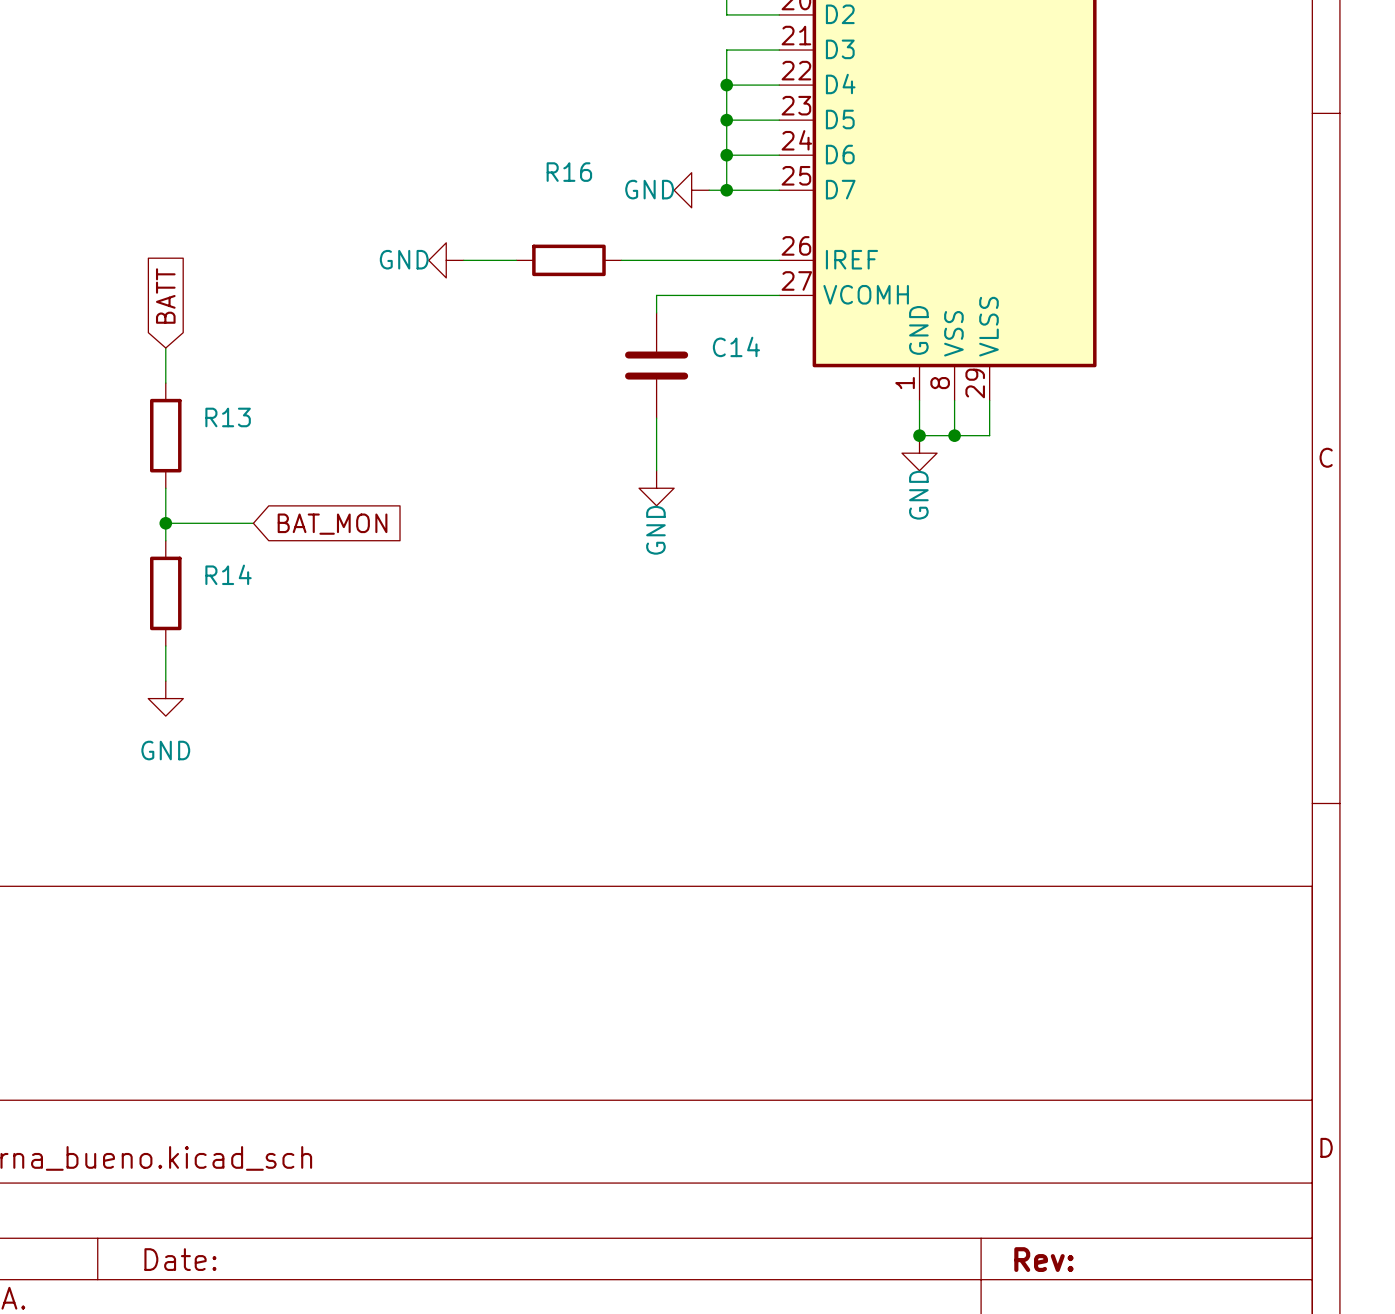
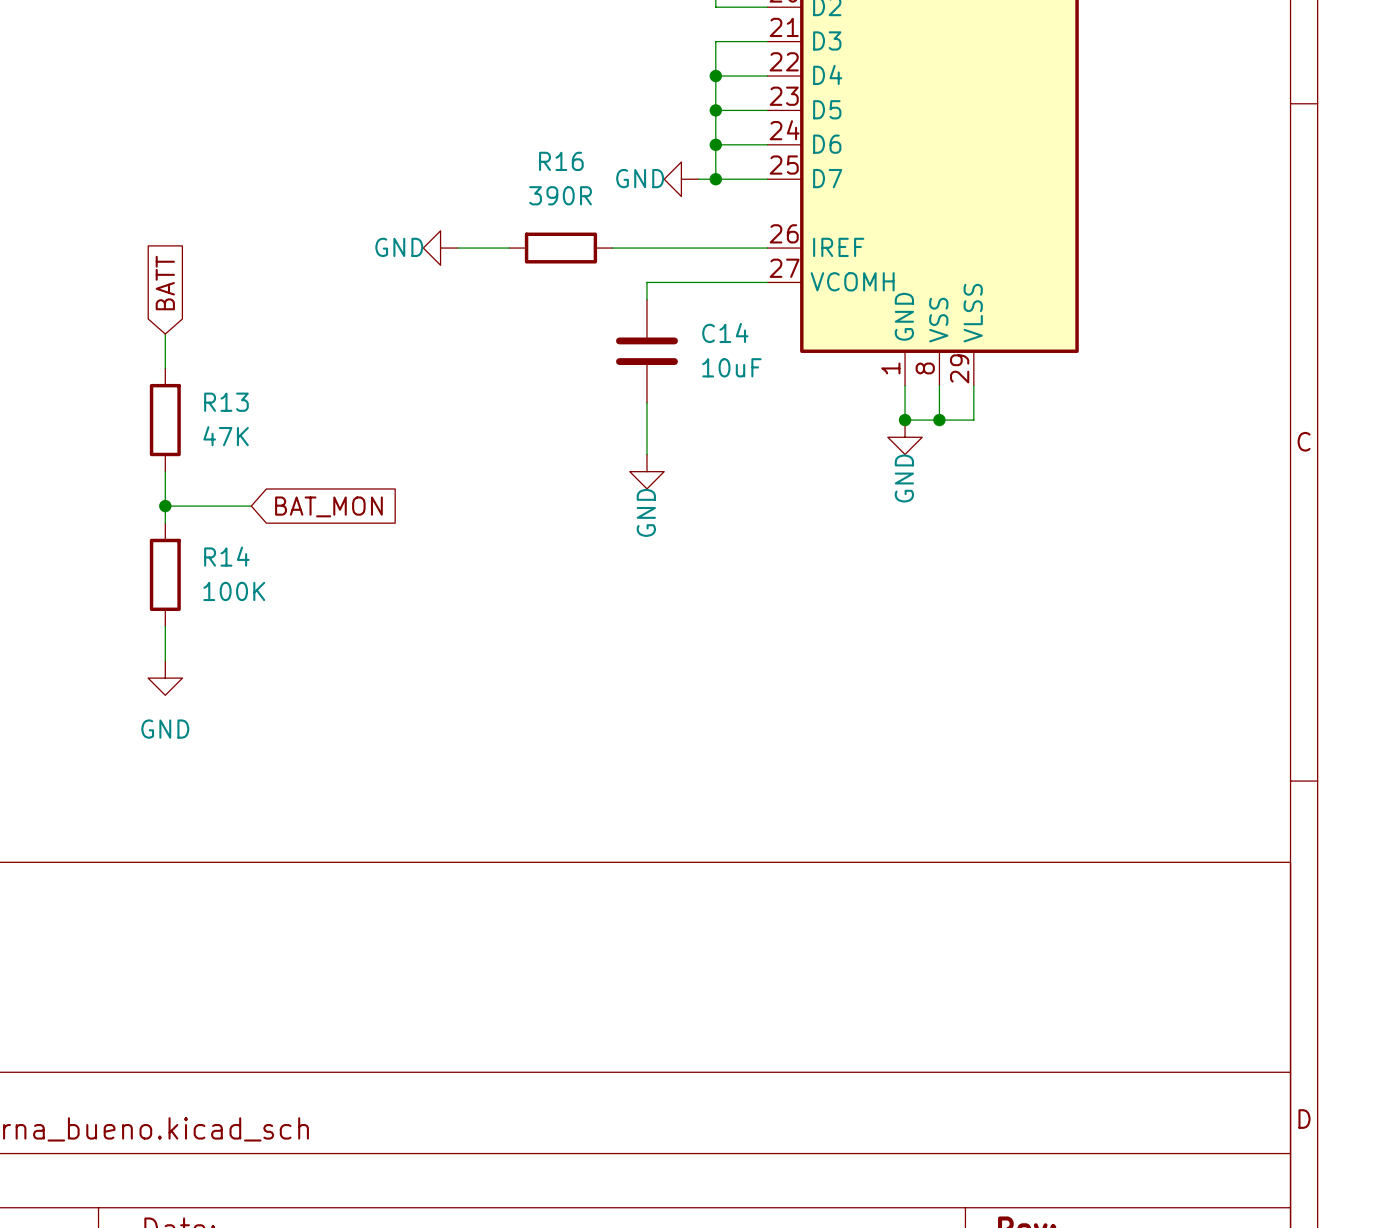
R16 value: none -> 390R (560, 195)
C14 value: none -> 10uF (731, 367)
R13 value: none -> 47K (226, 436)
R14 value: none -> 100K (234, 591)

